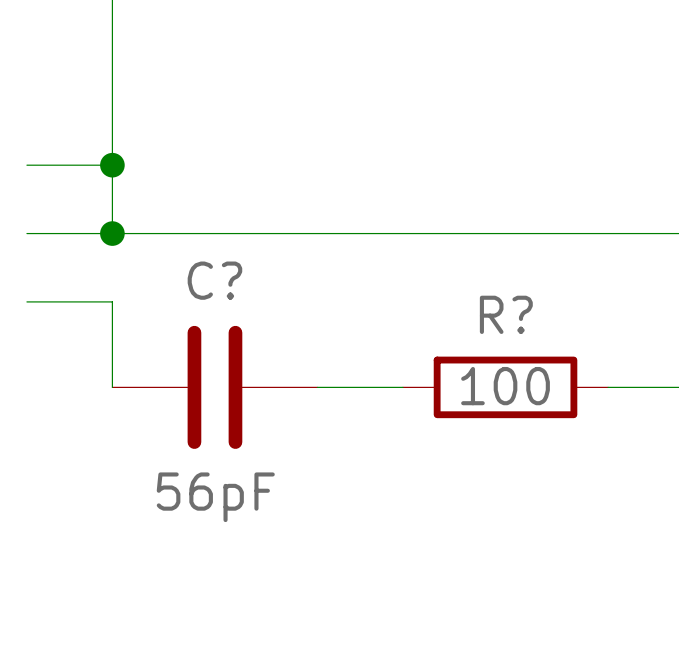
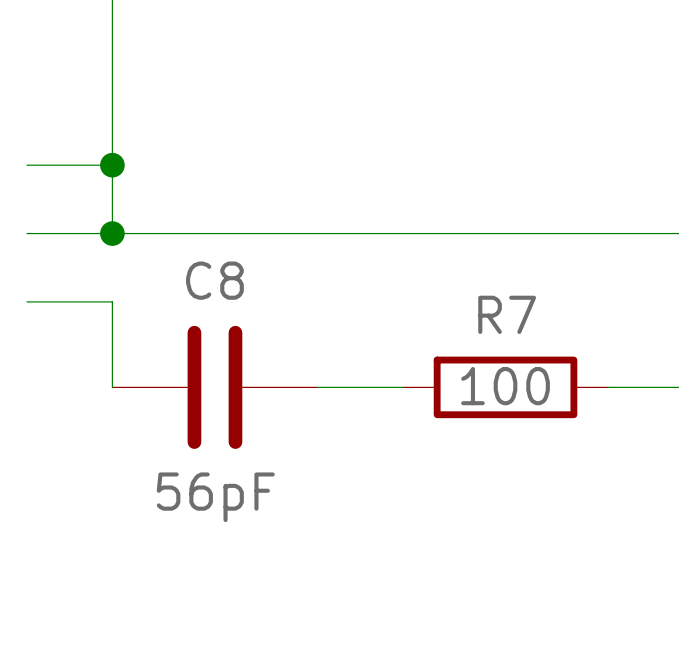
C? name: C? (214, 280) -> C8 (214, 280)
R? name: R? (506, 314) -> R7 (507, 314)

